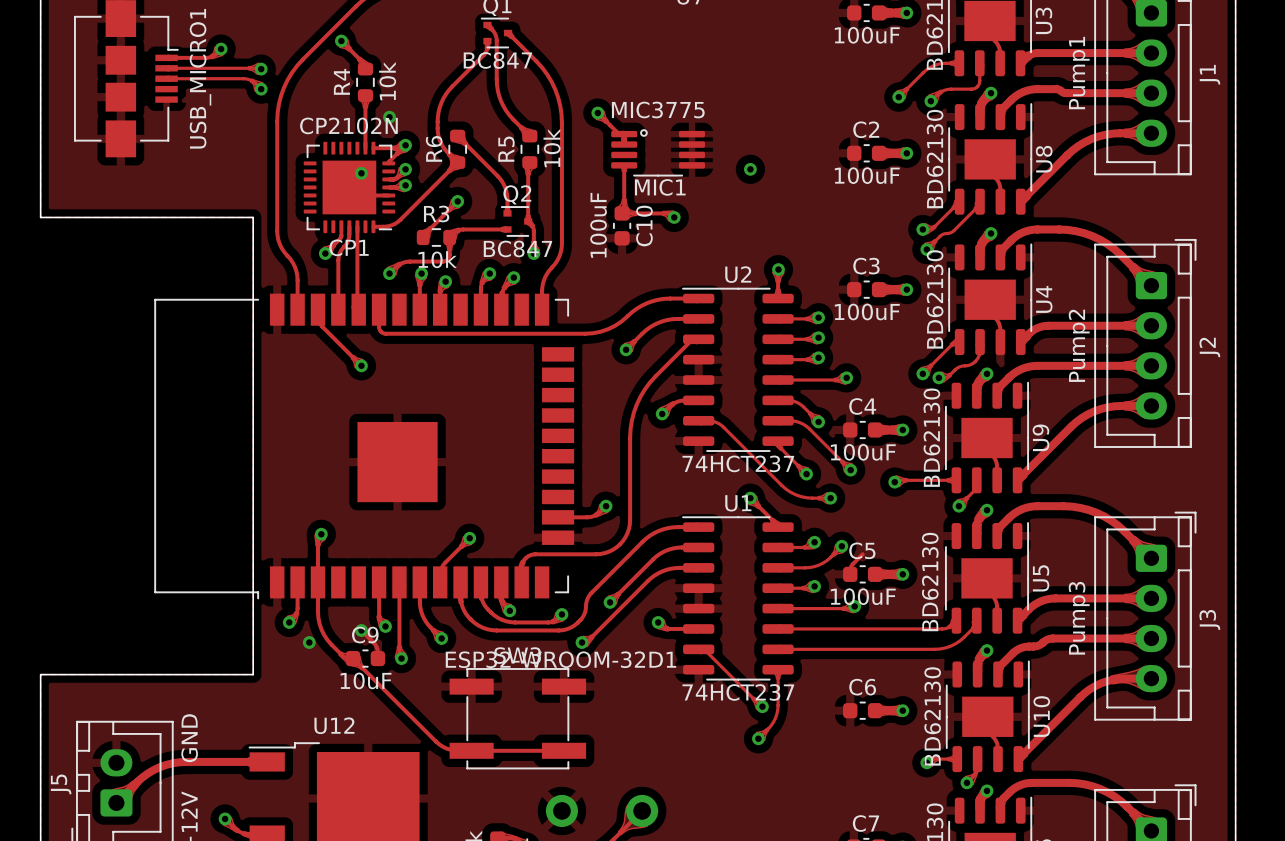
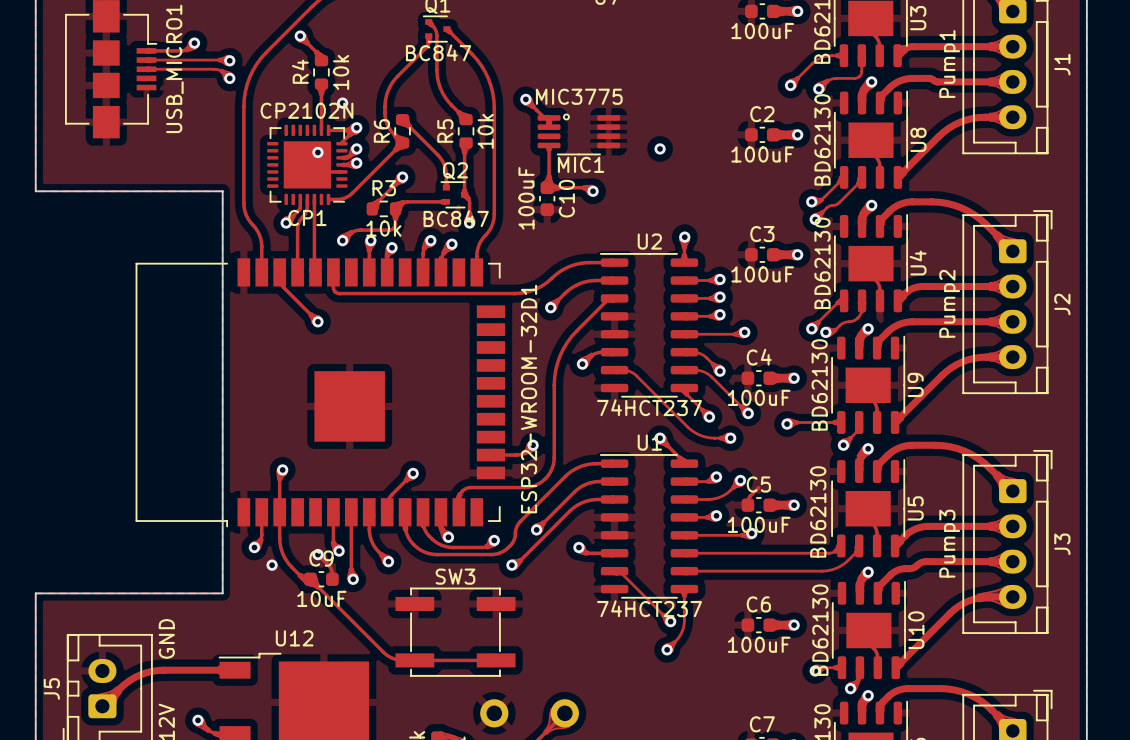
ESP32-WROOM-32D1 name rotation: 0° (560, 659) -> 90° counterclockwise (529, 399)
C6 value: none -> 100uF (759, 644)

